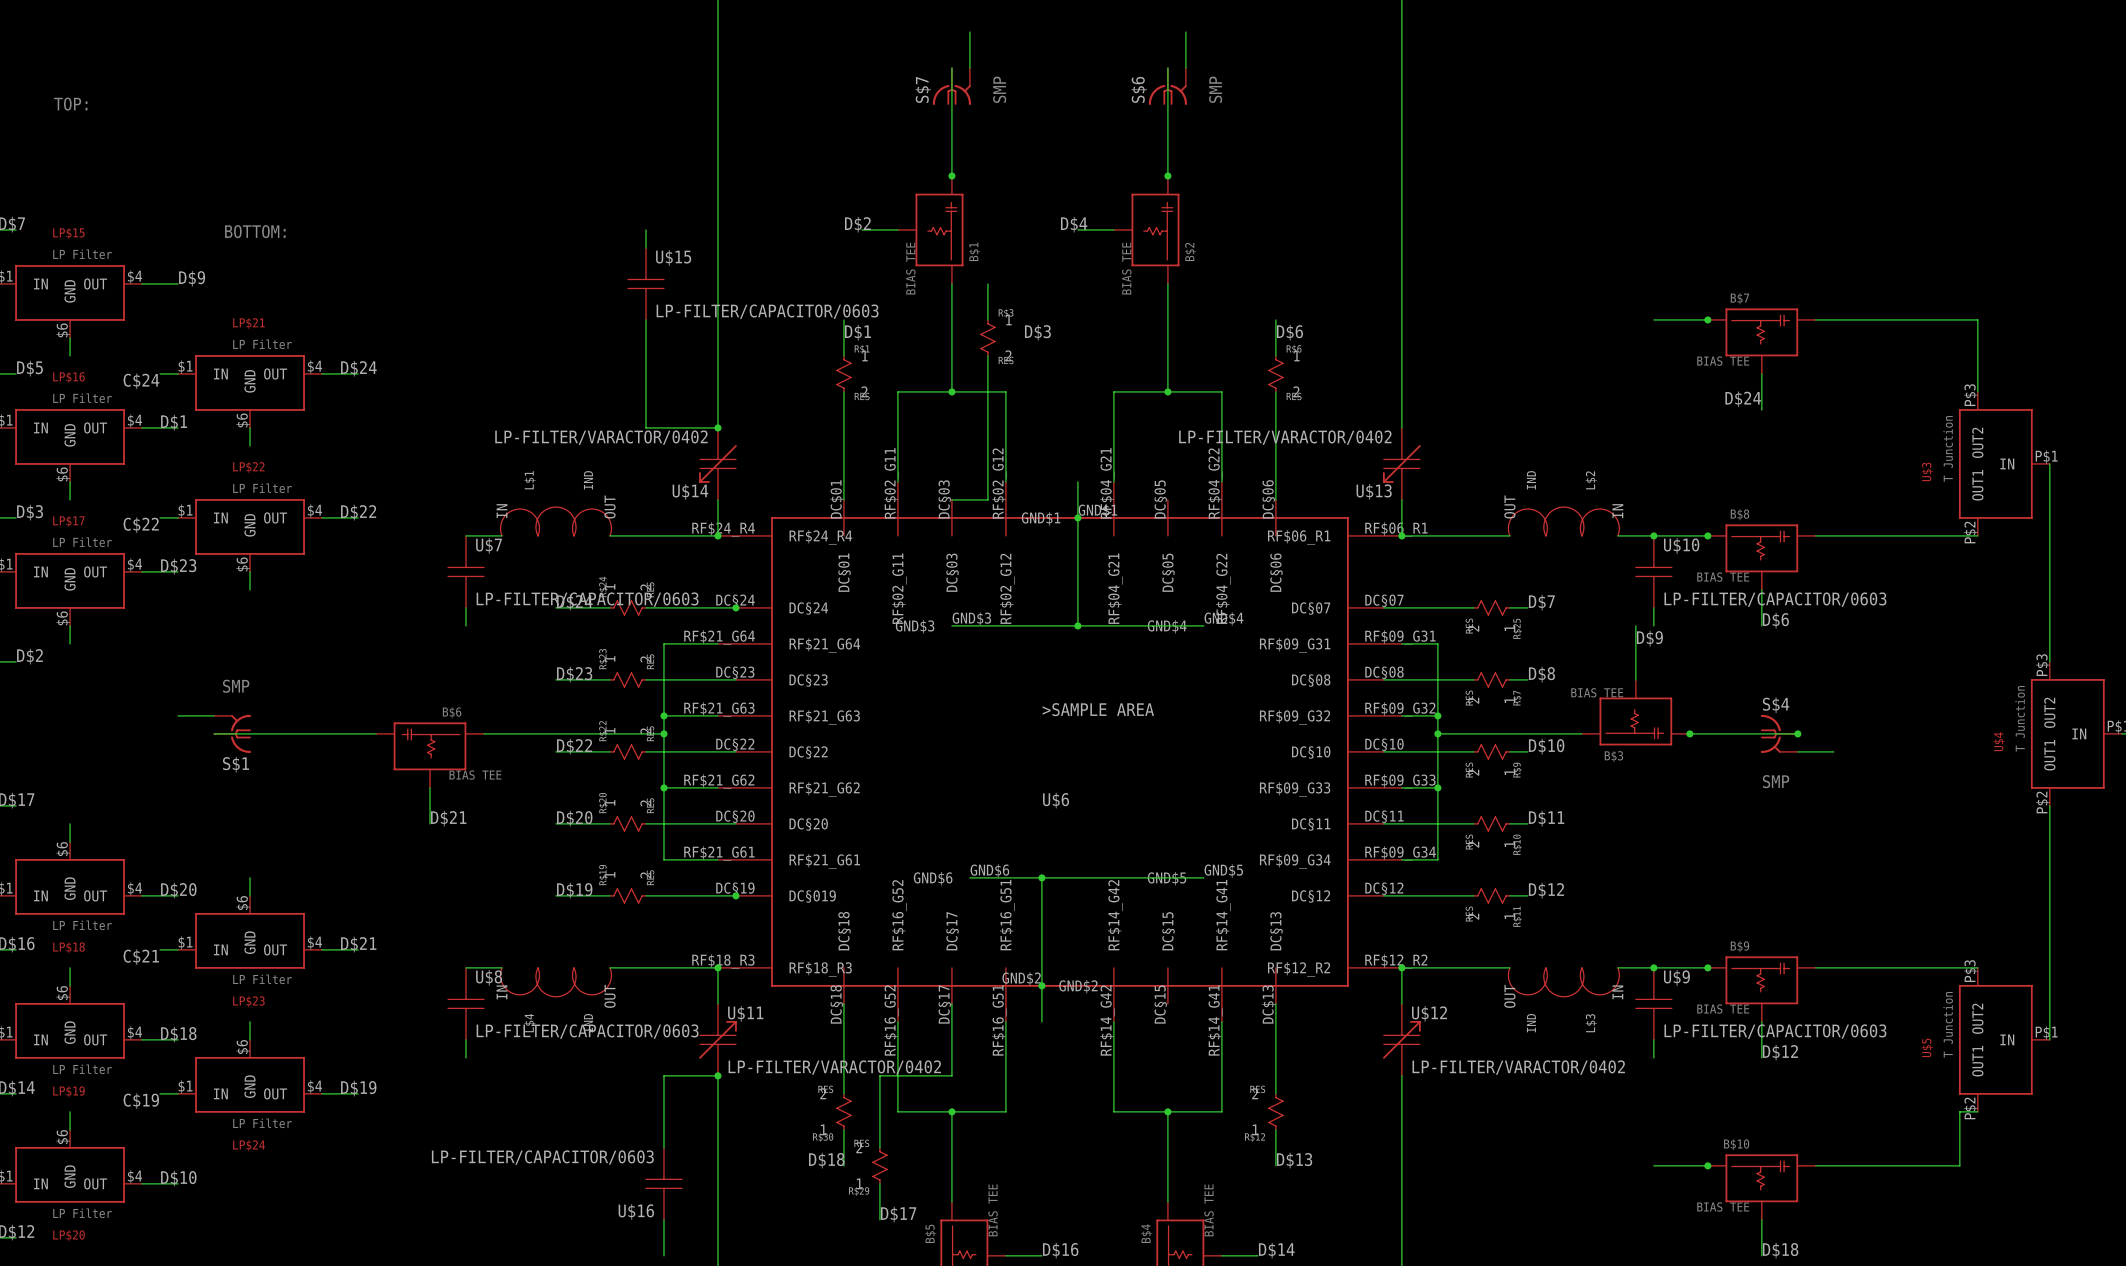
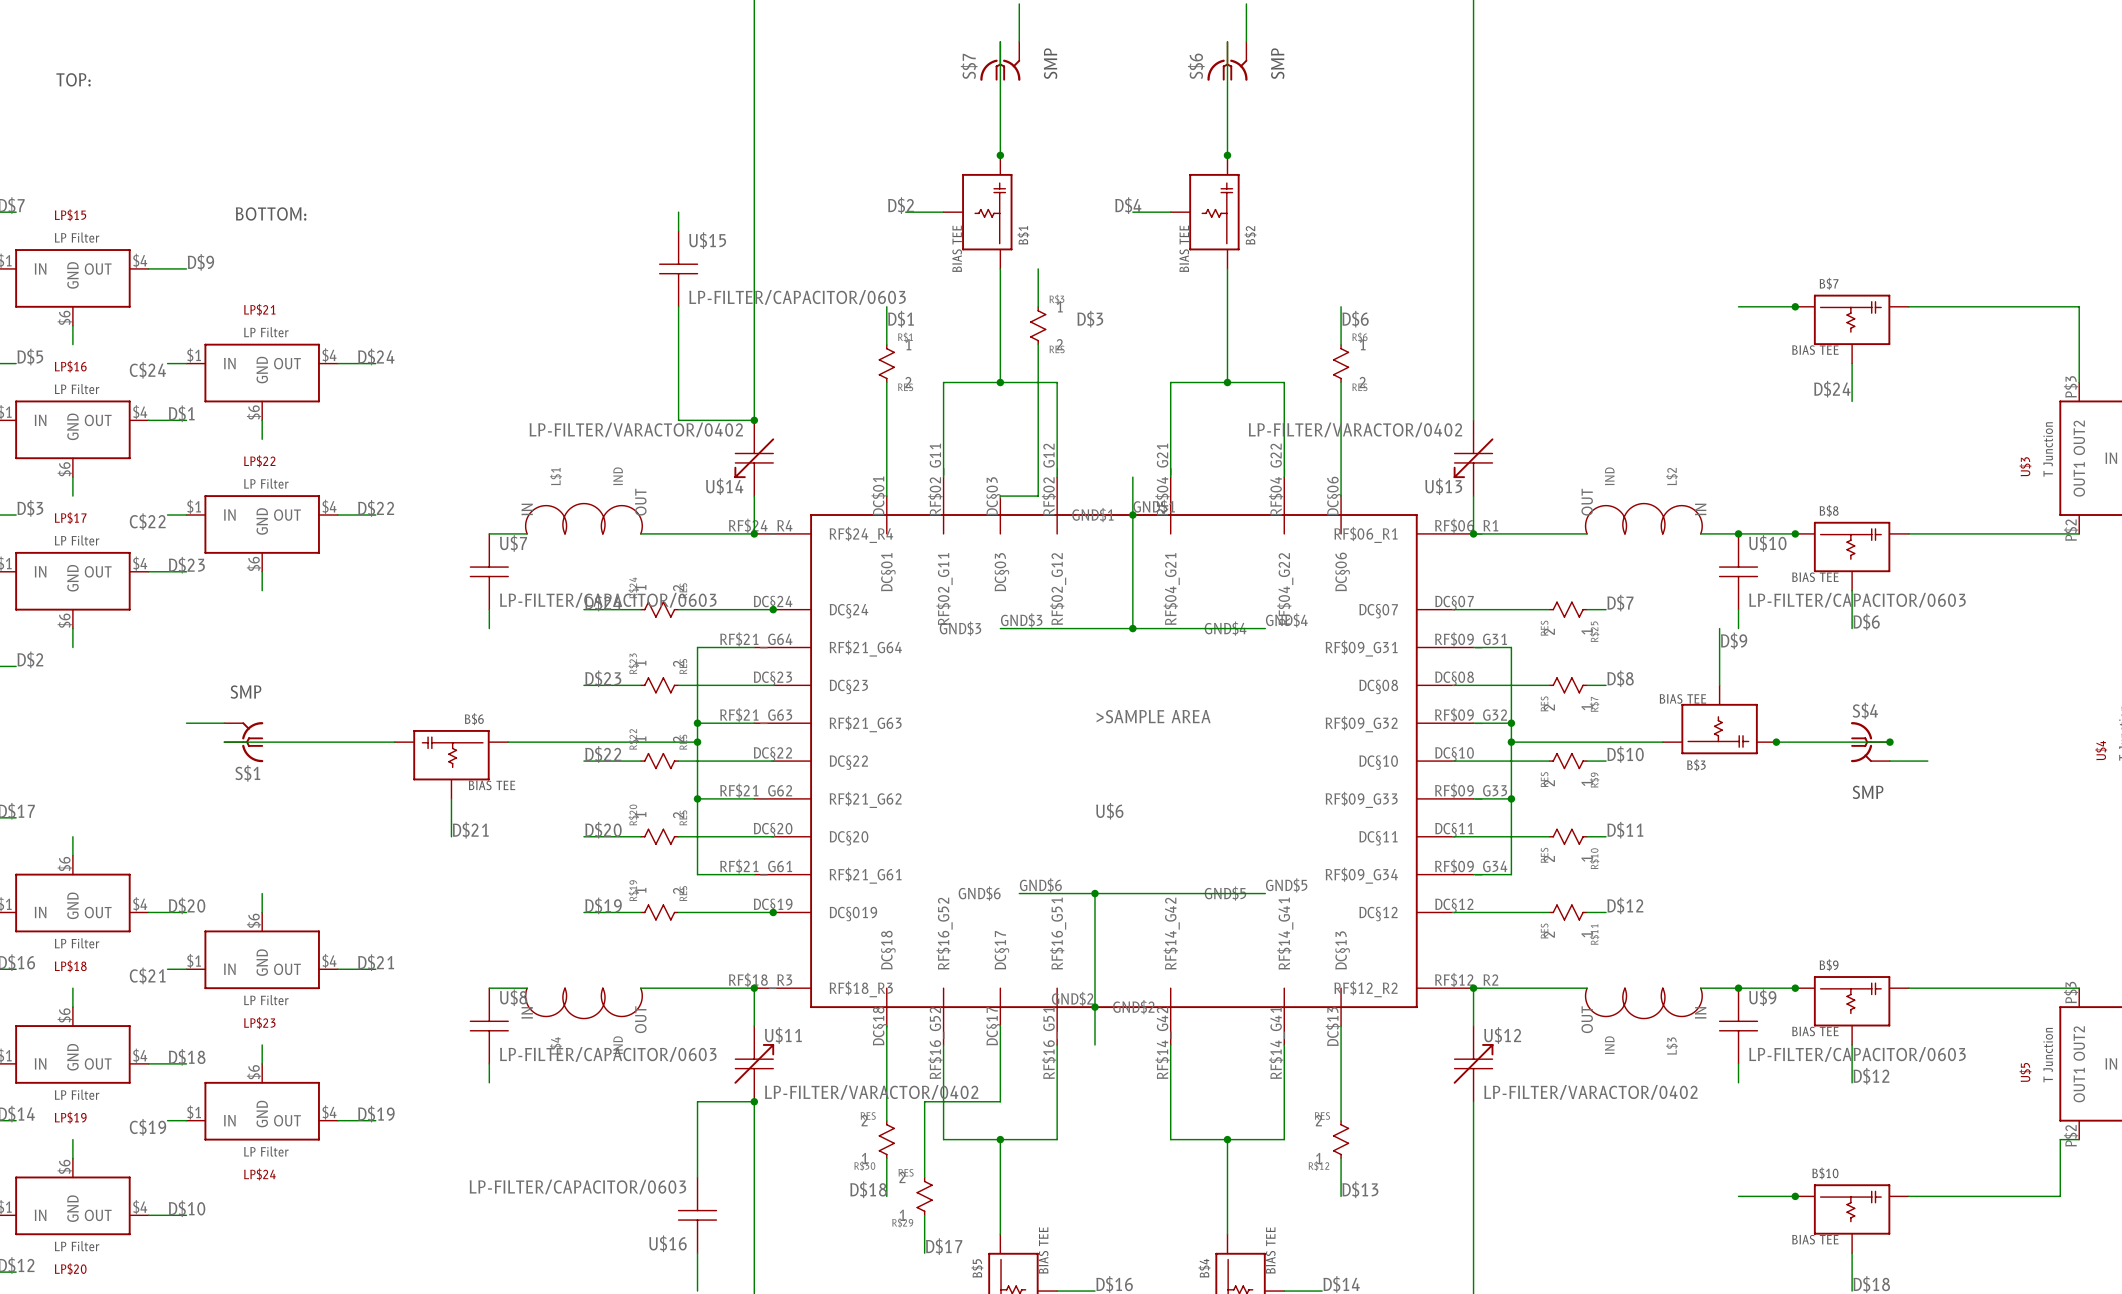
U$6 symbol: [717, 481, 1402, 1022] -> [754, 477, 1474, 1045]

